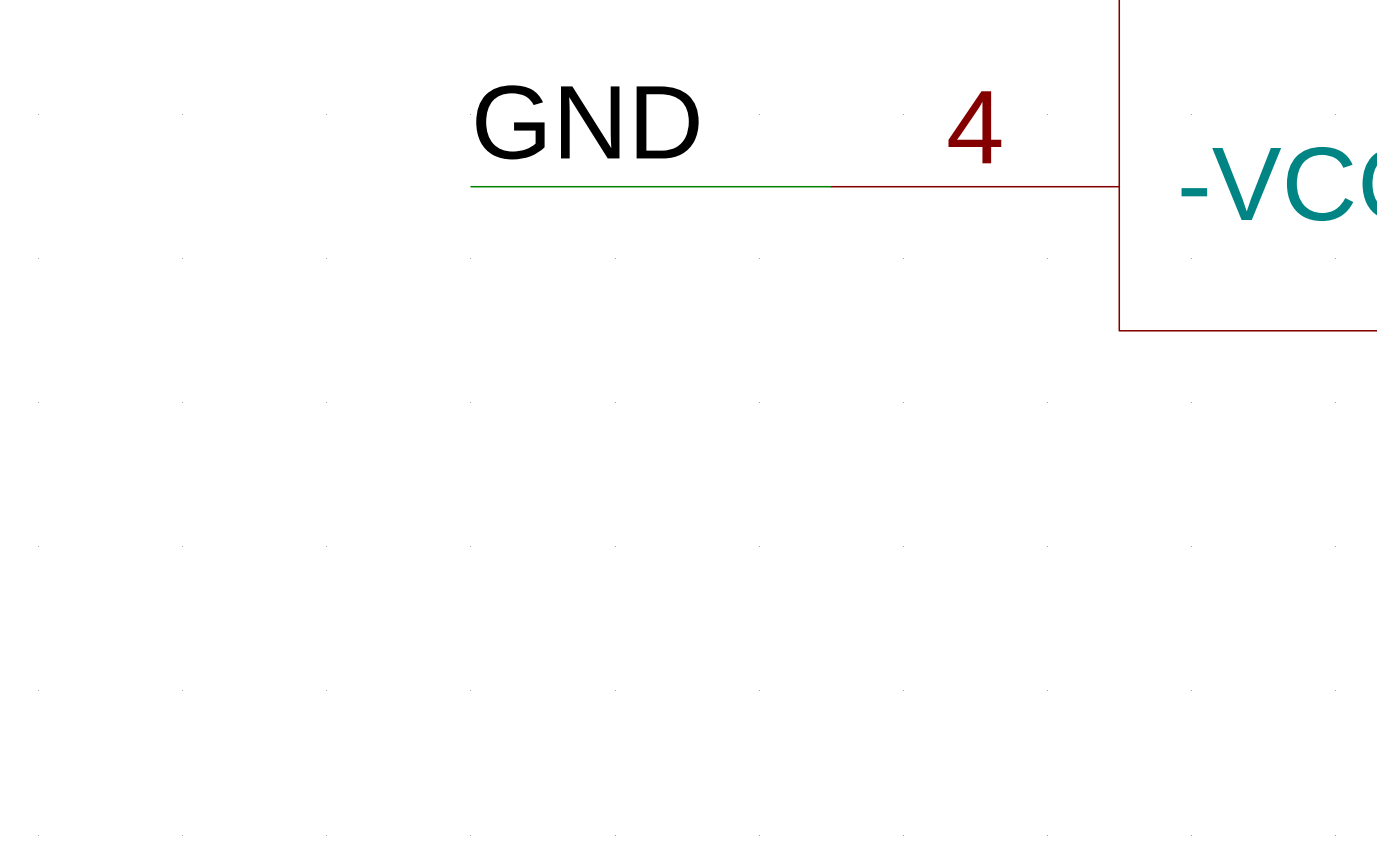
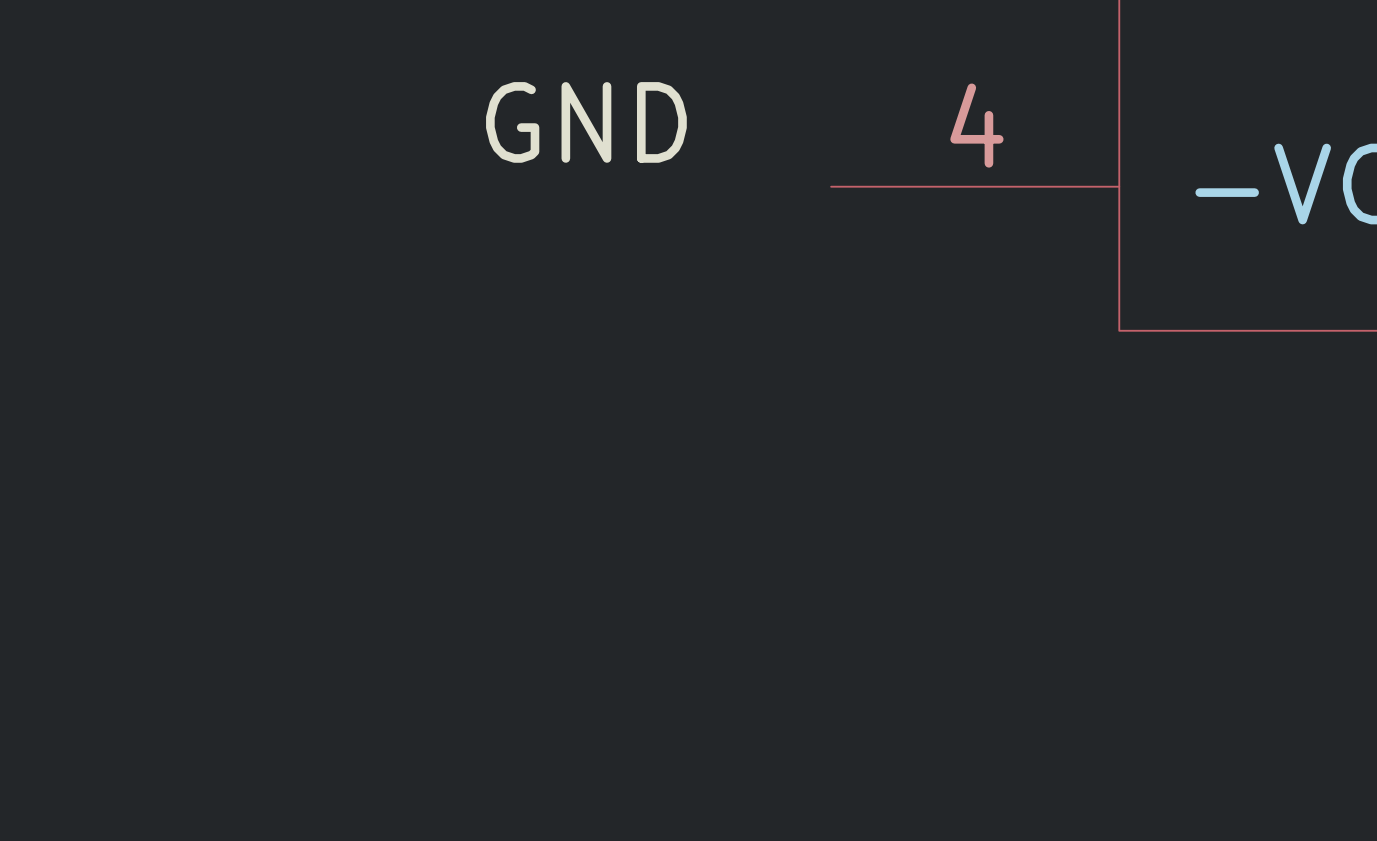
wire: (470, 186) (831, 186) -> none

